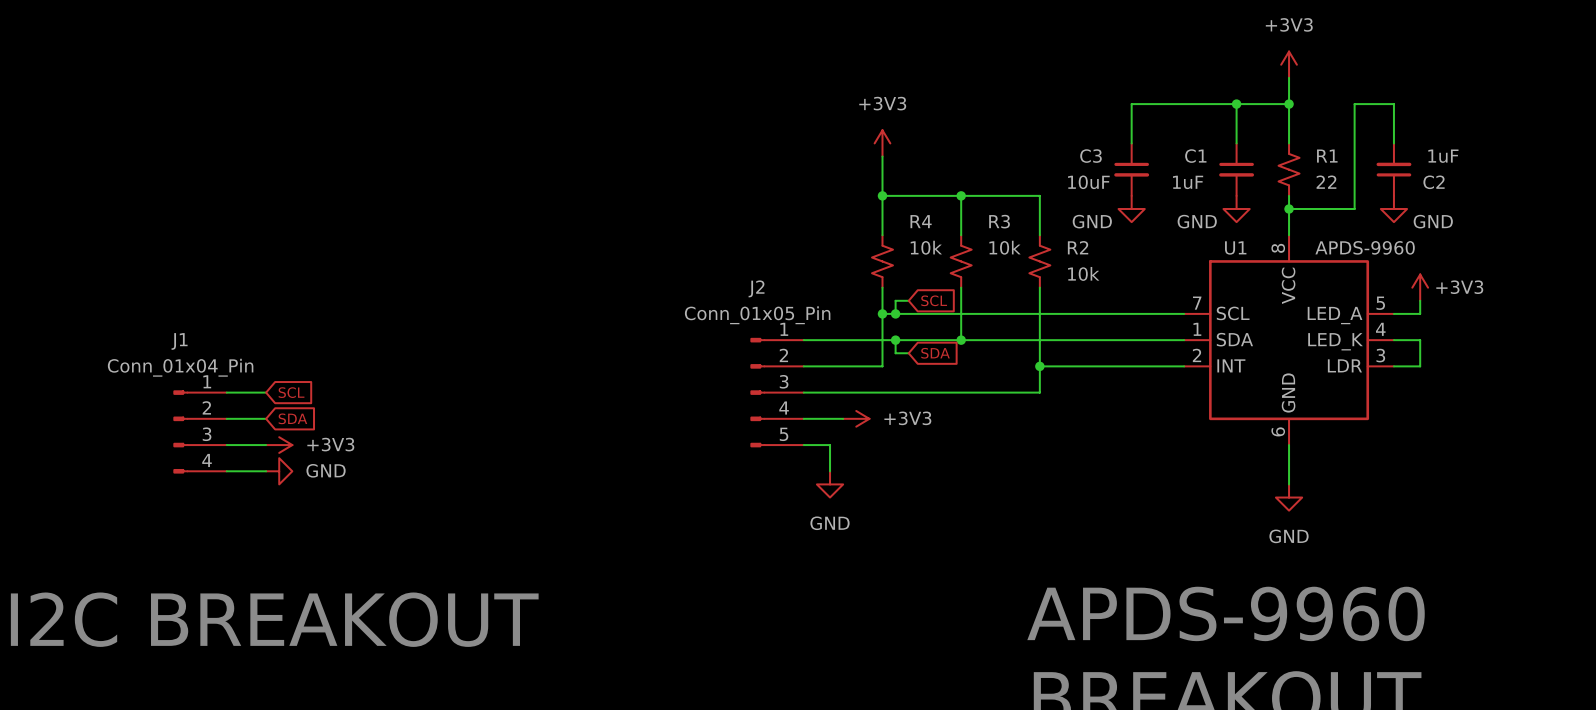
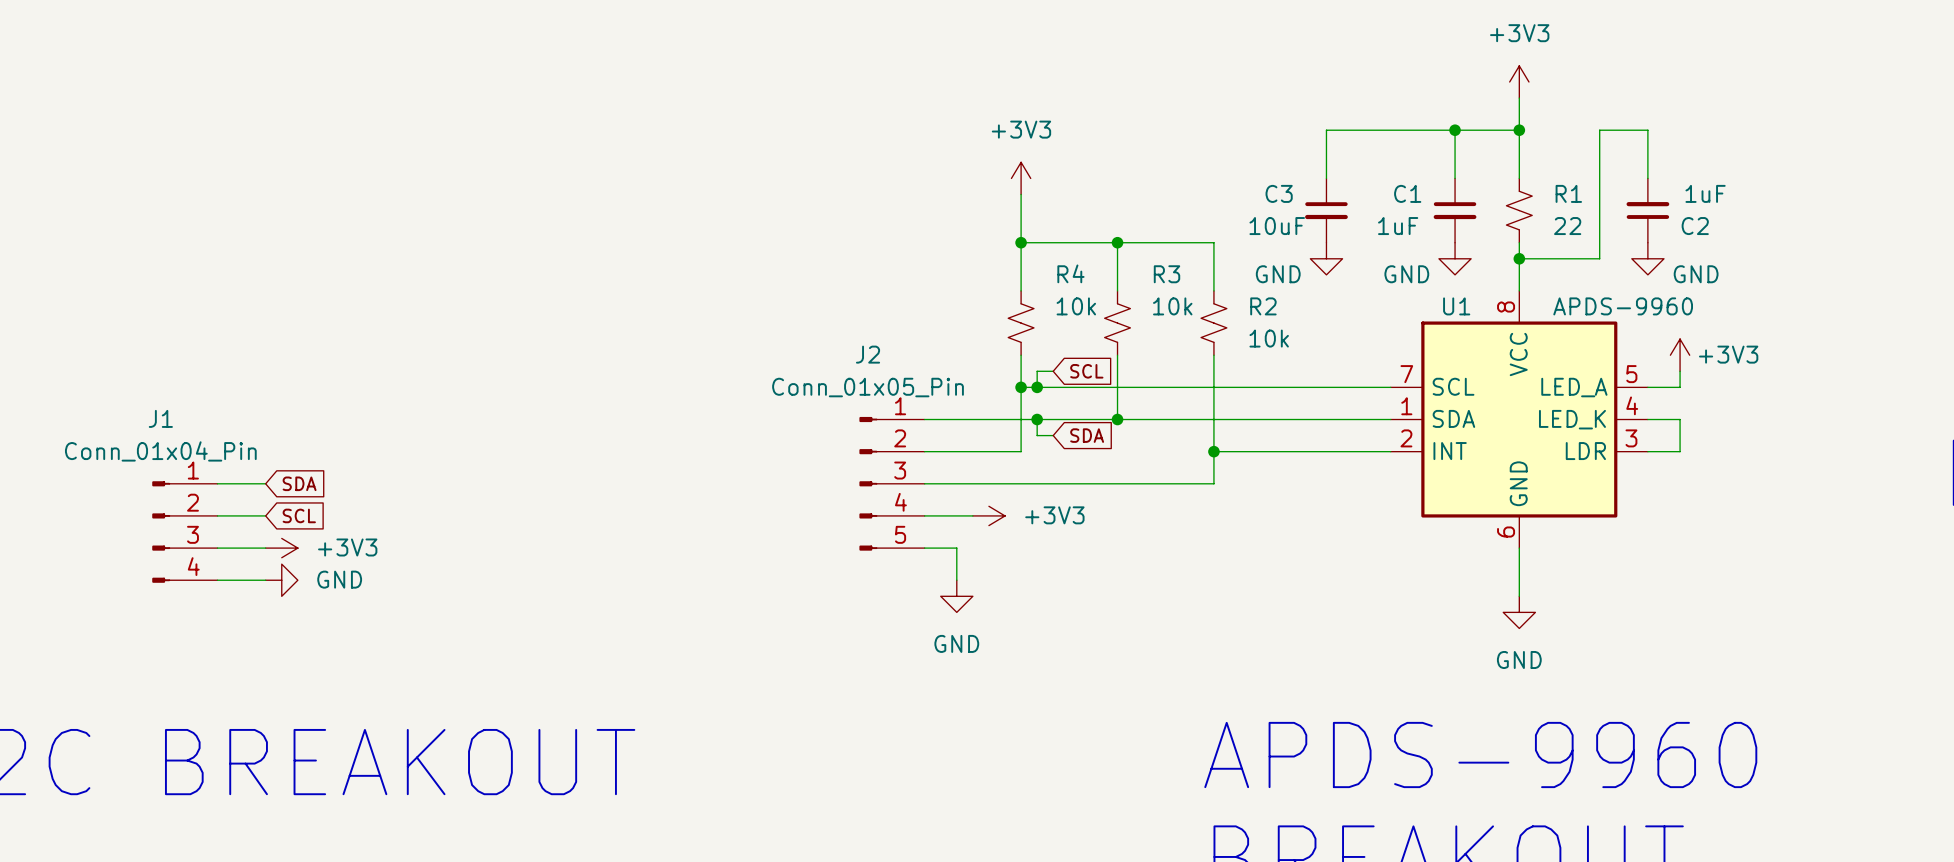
global label: SCL (291, 392) -> SDA (299, 483)
global label: SDA (292, 418) -> SCL (299, 515)

